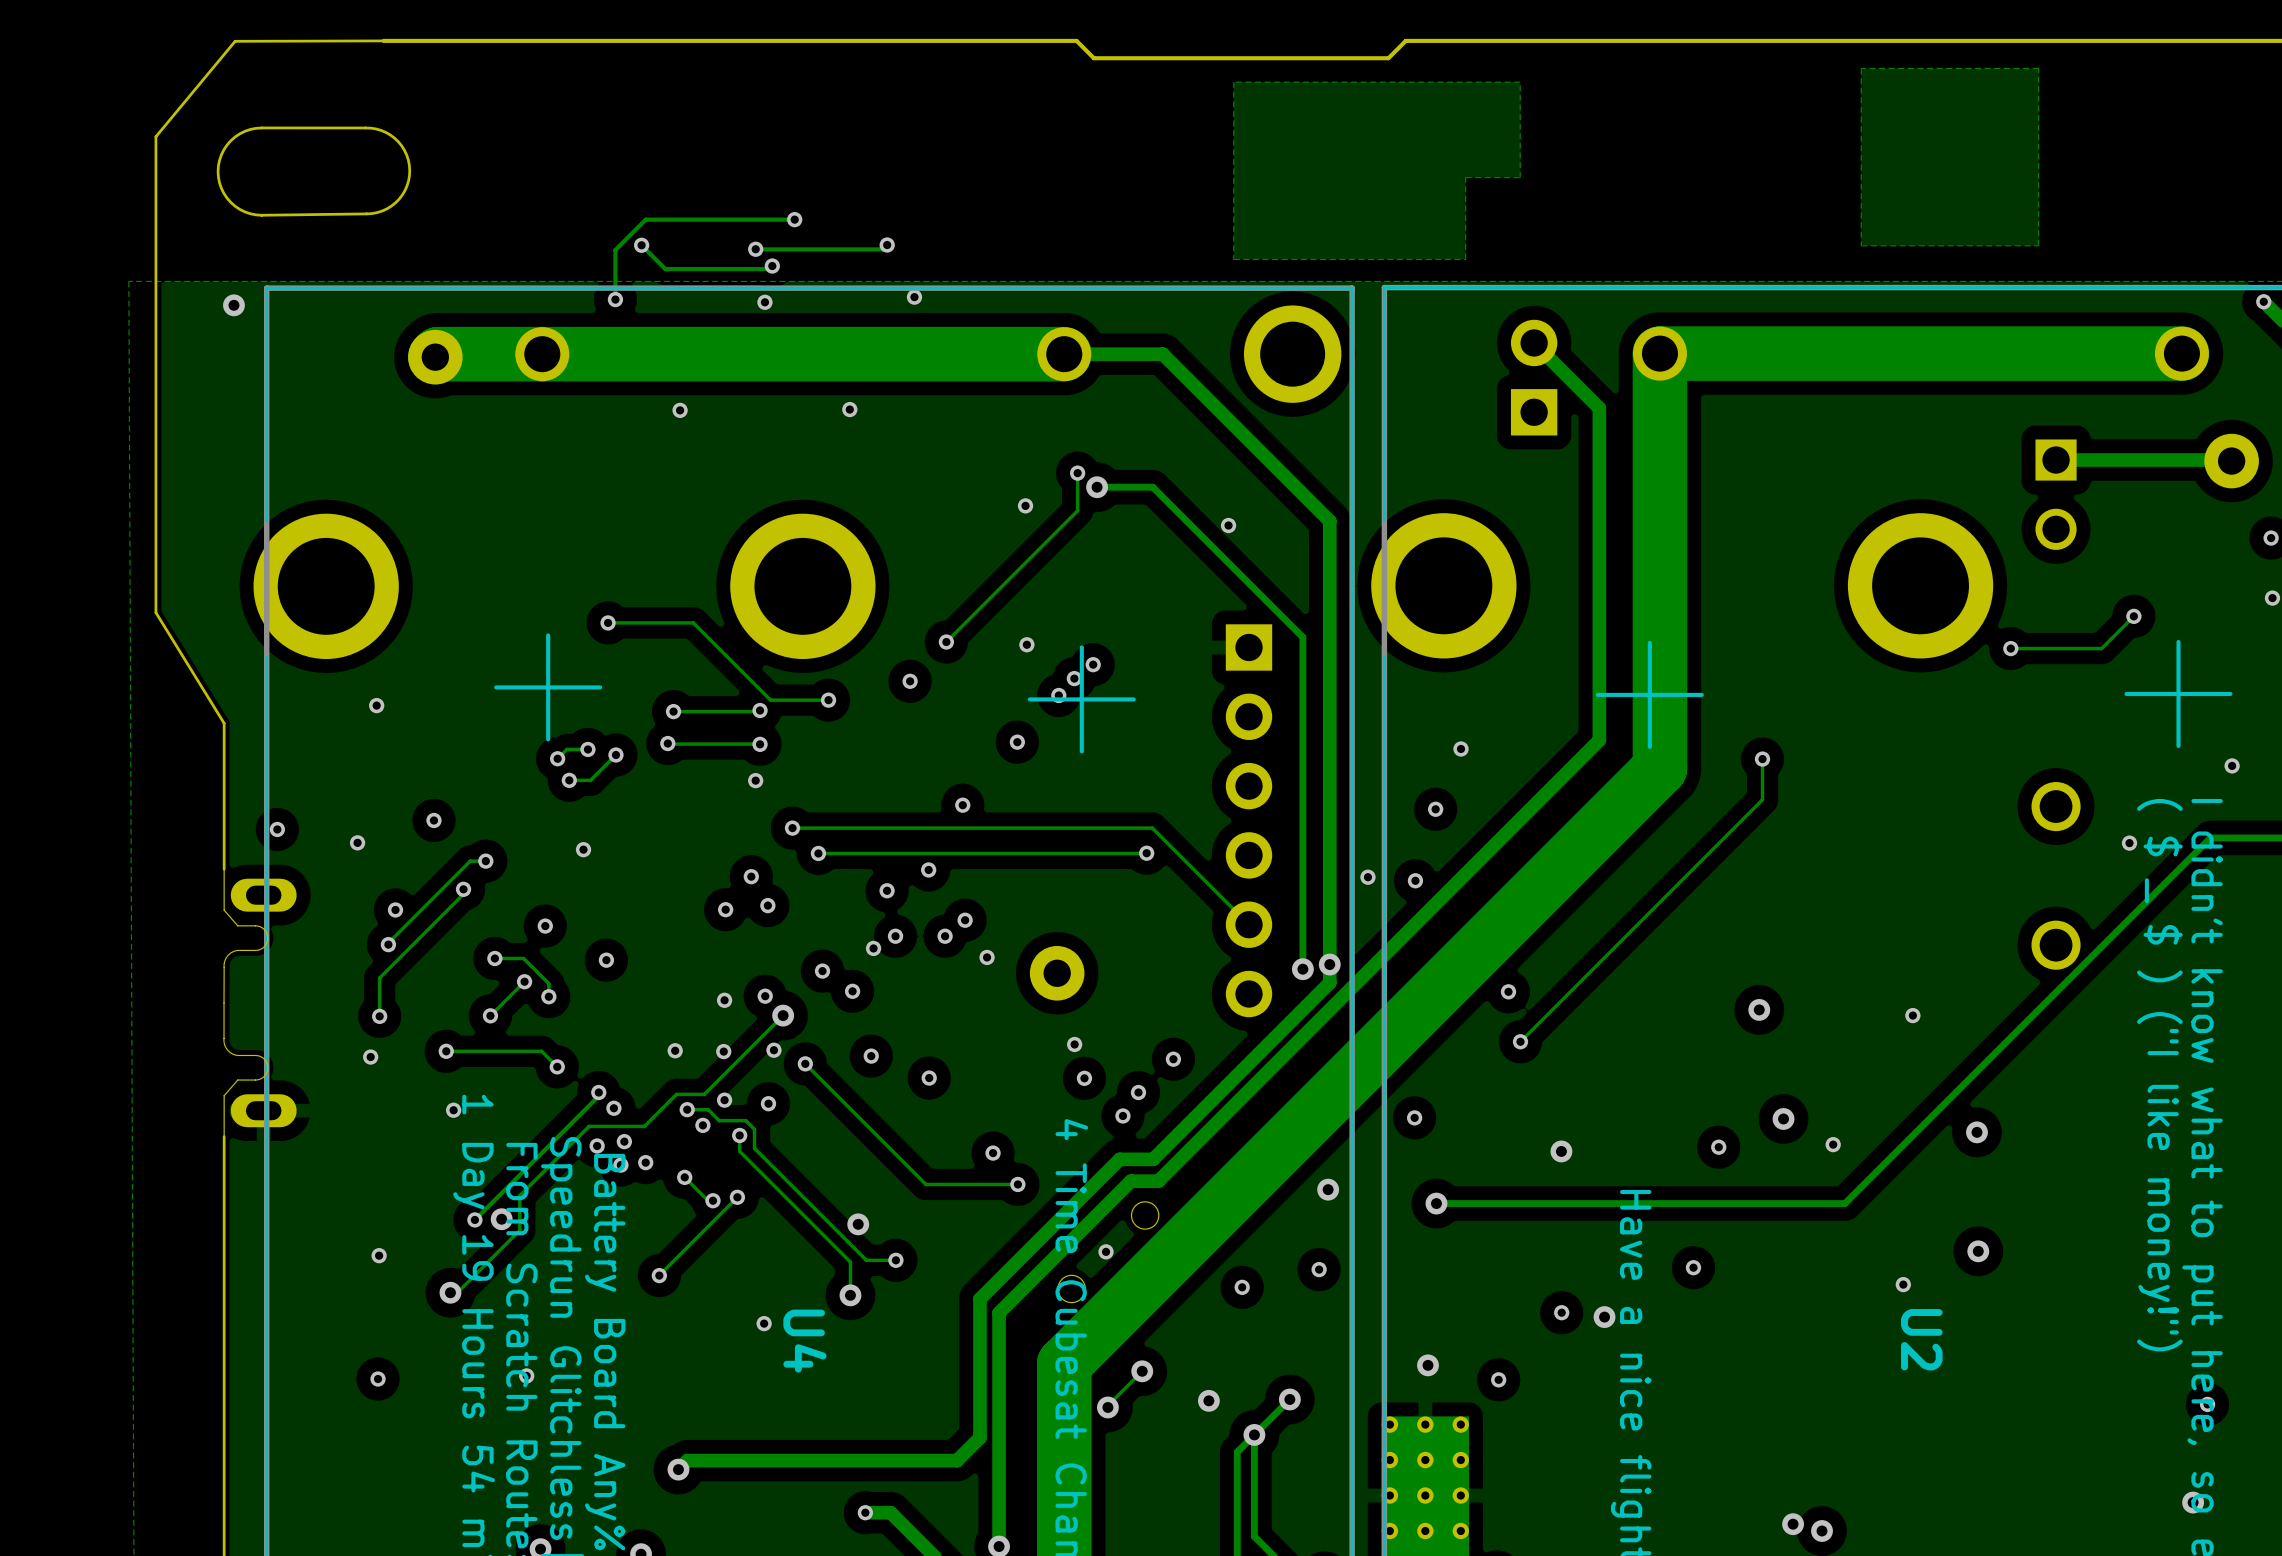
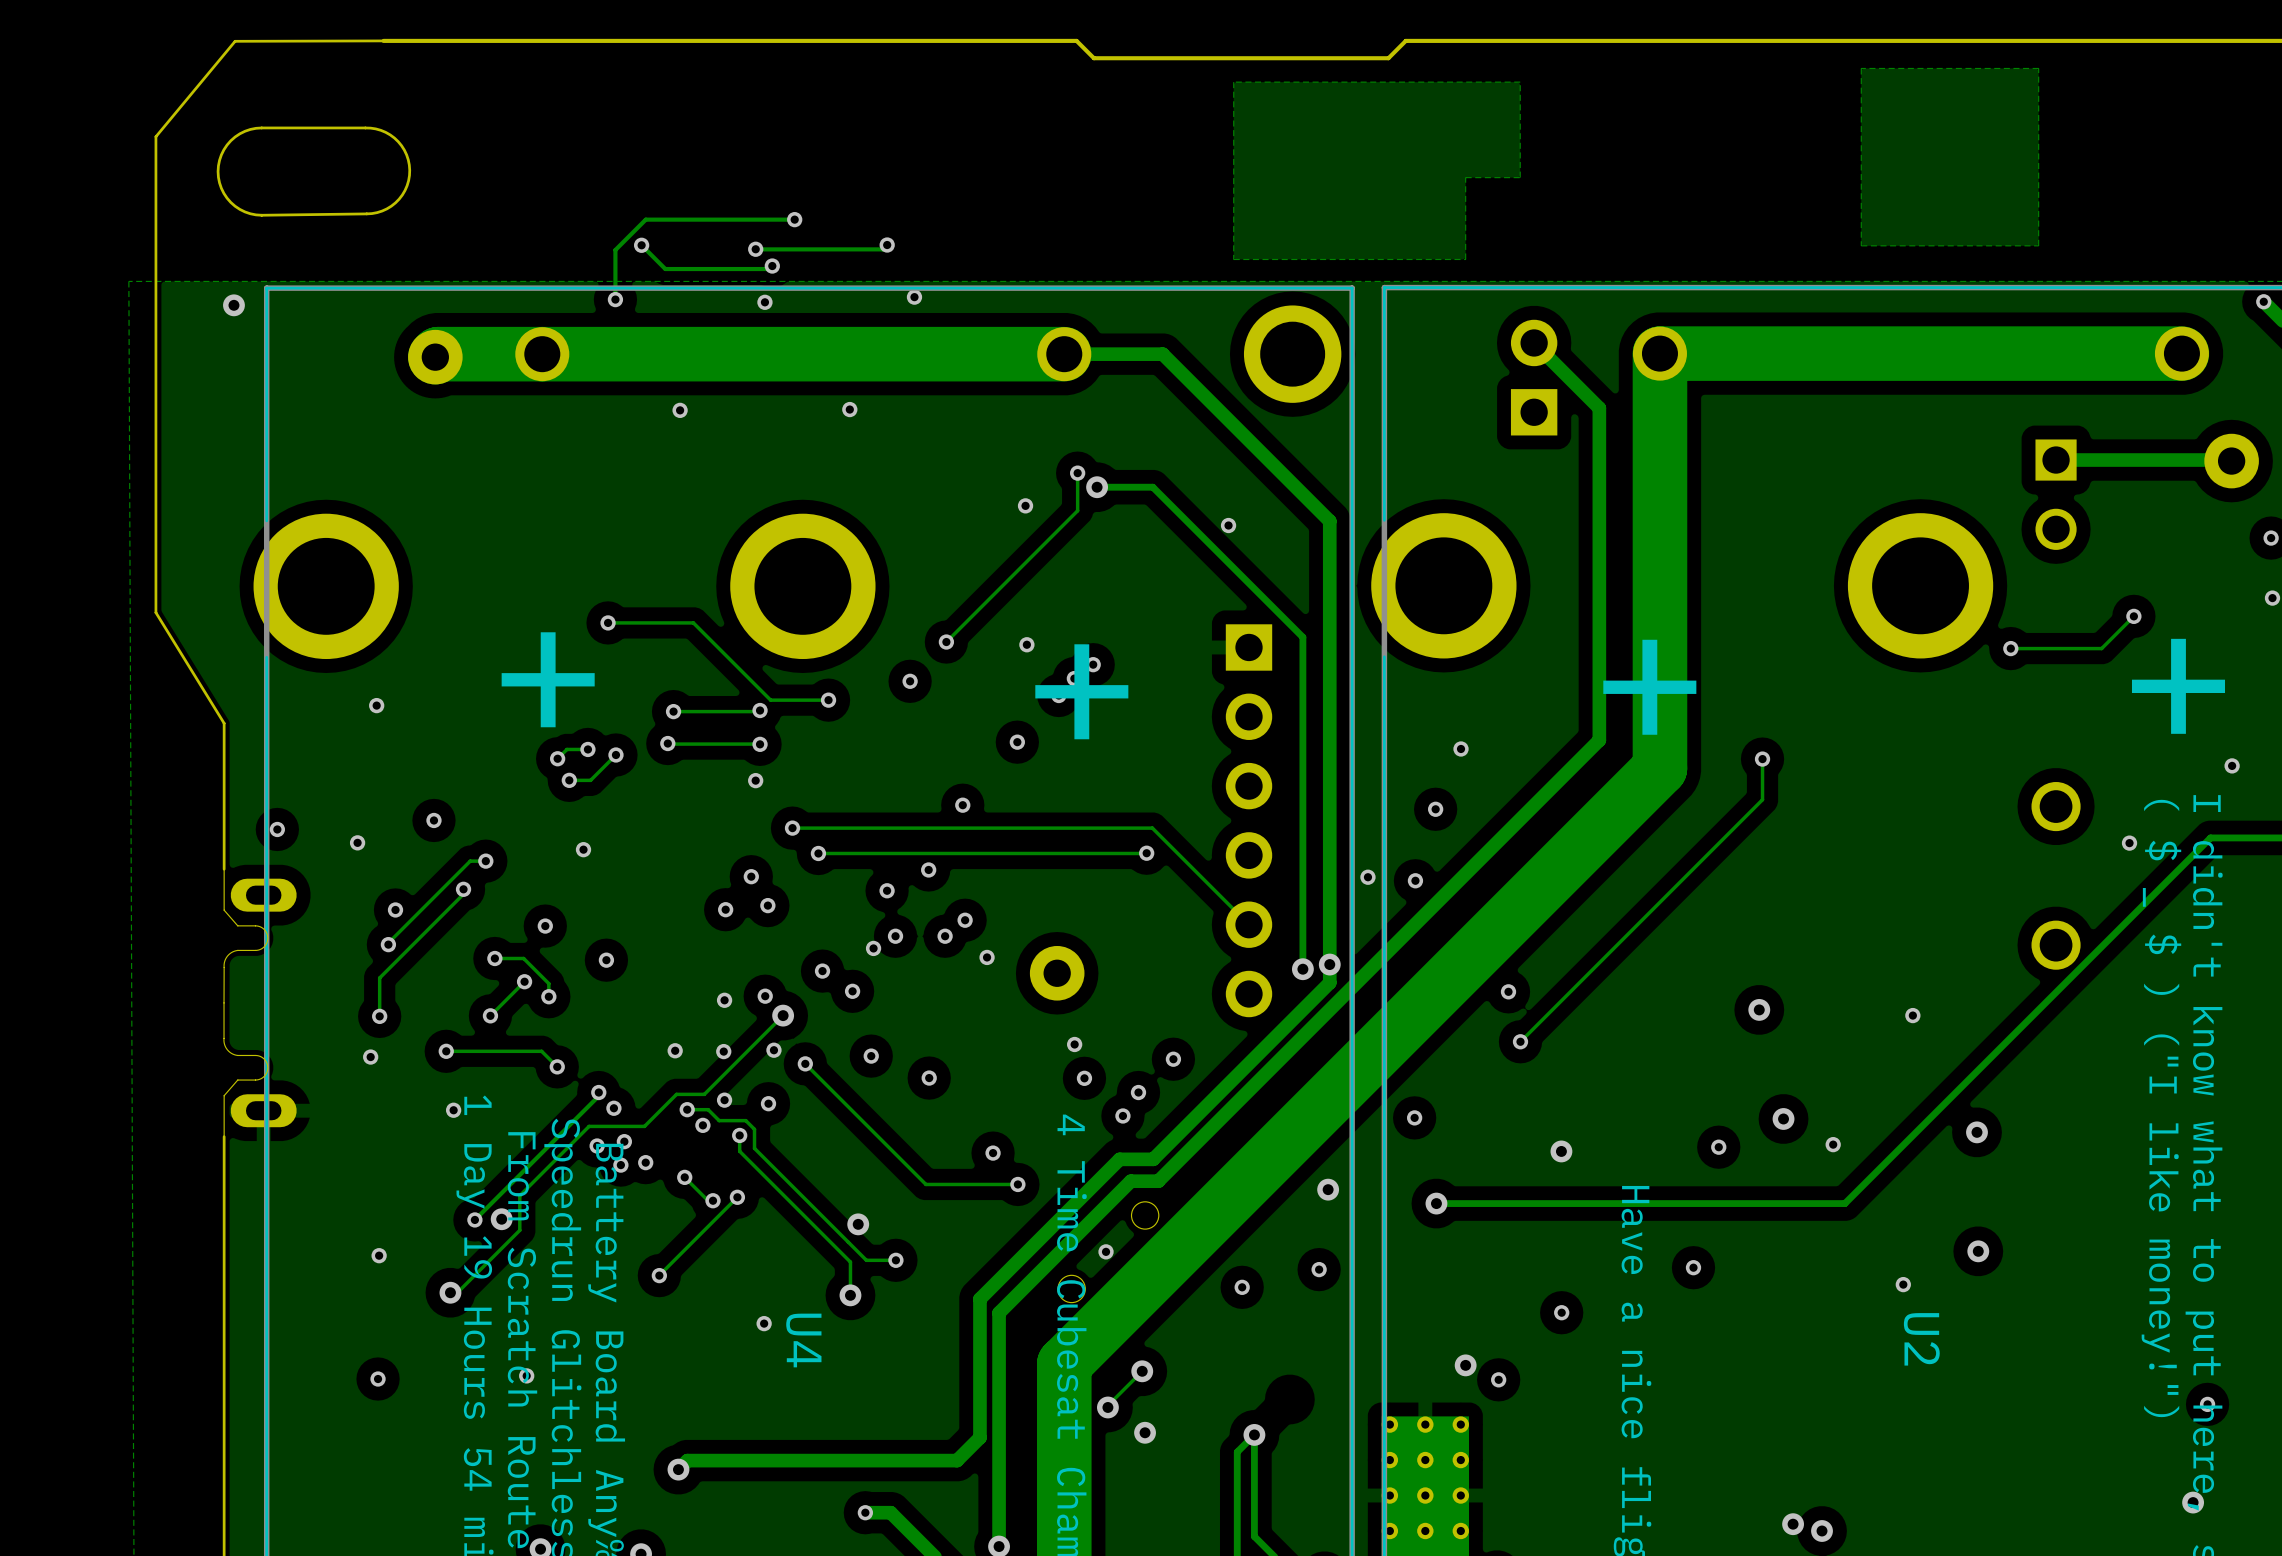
via: (1604, 1317) -> none
via position: (1428, 1365) -> (1465, 1365)
track: (1289, 1399) (1254, 1434) -> none
via: (1289, 1399) -> none
via position: (1208, 1400) -> (1145, 1432)

